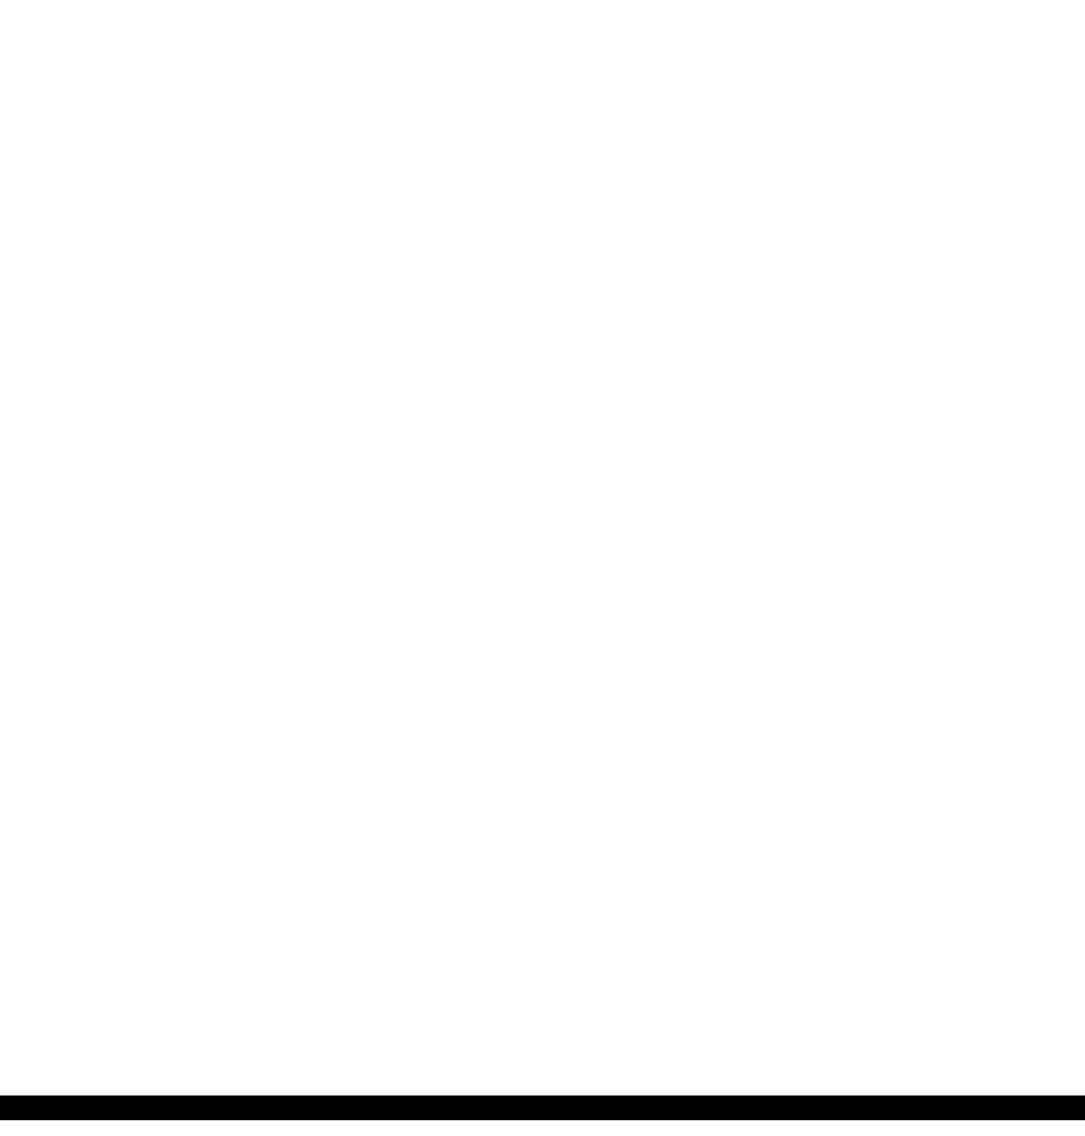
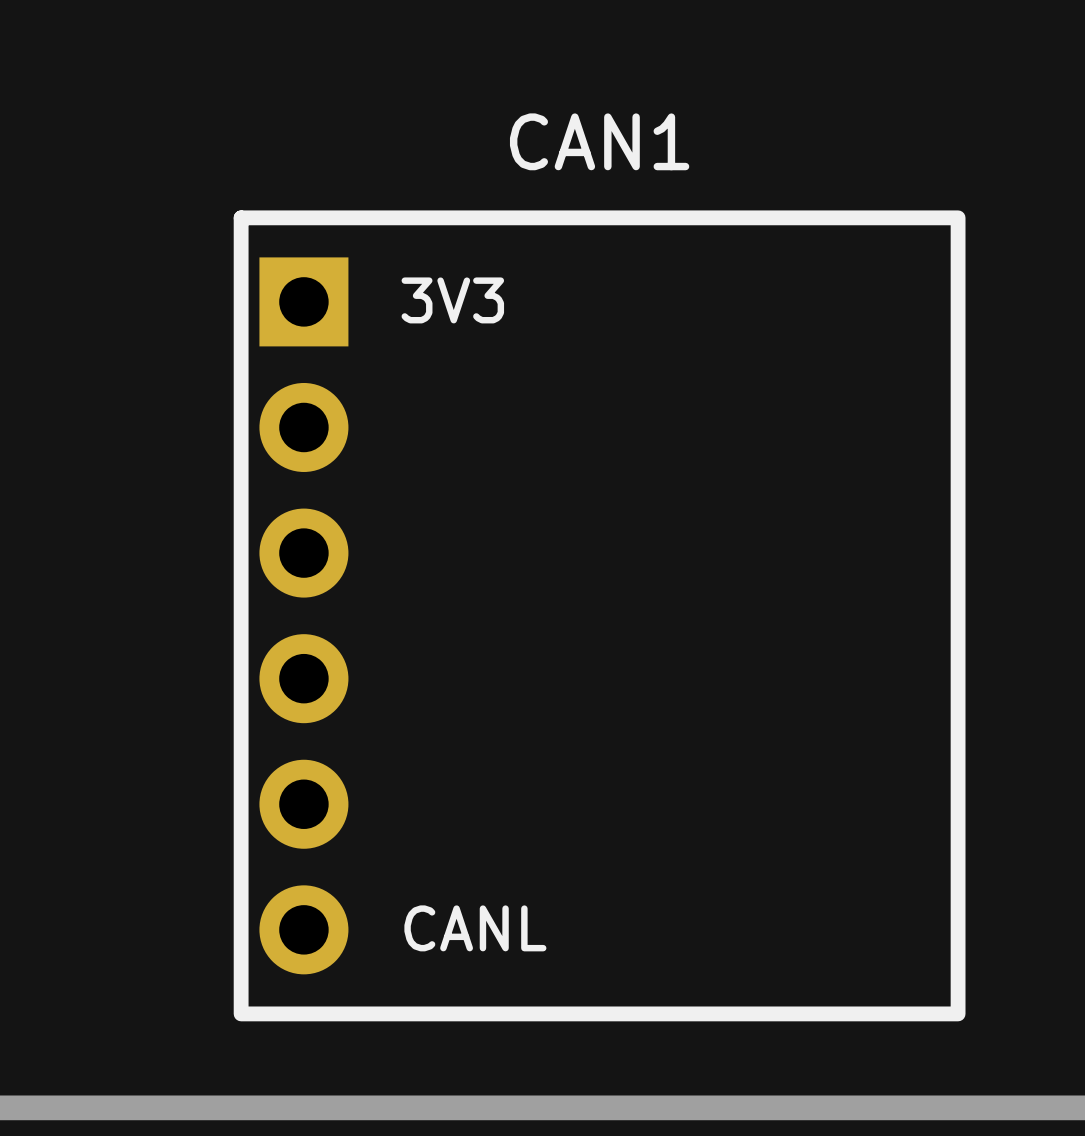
CAN1: none -> (599, 615)

